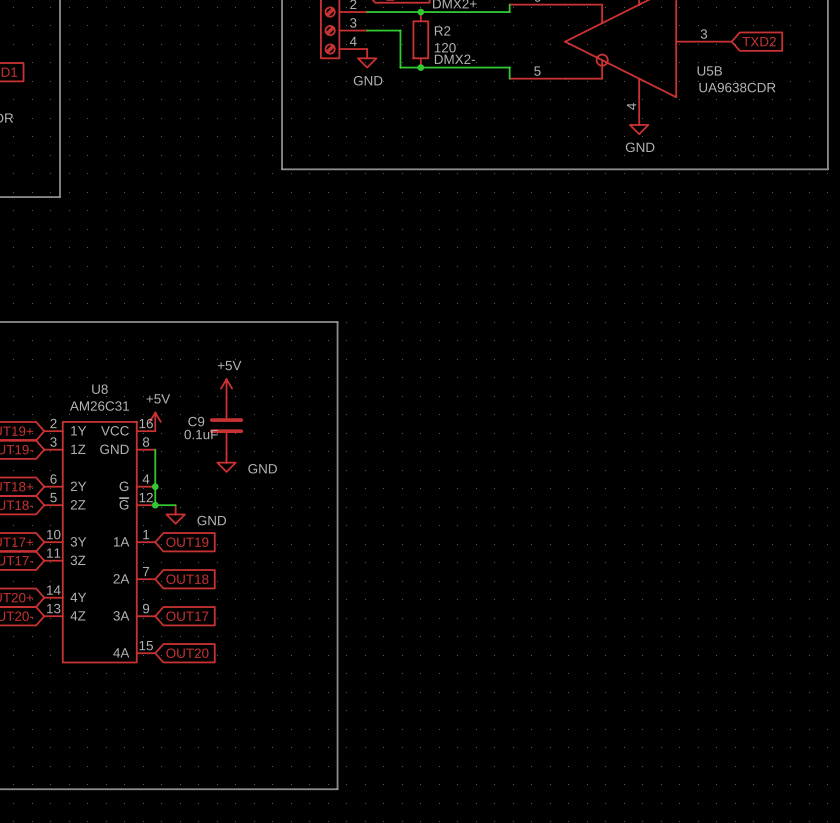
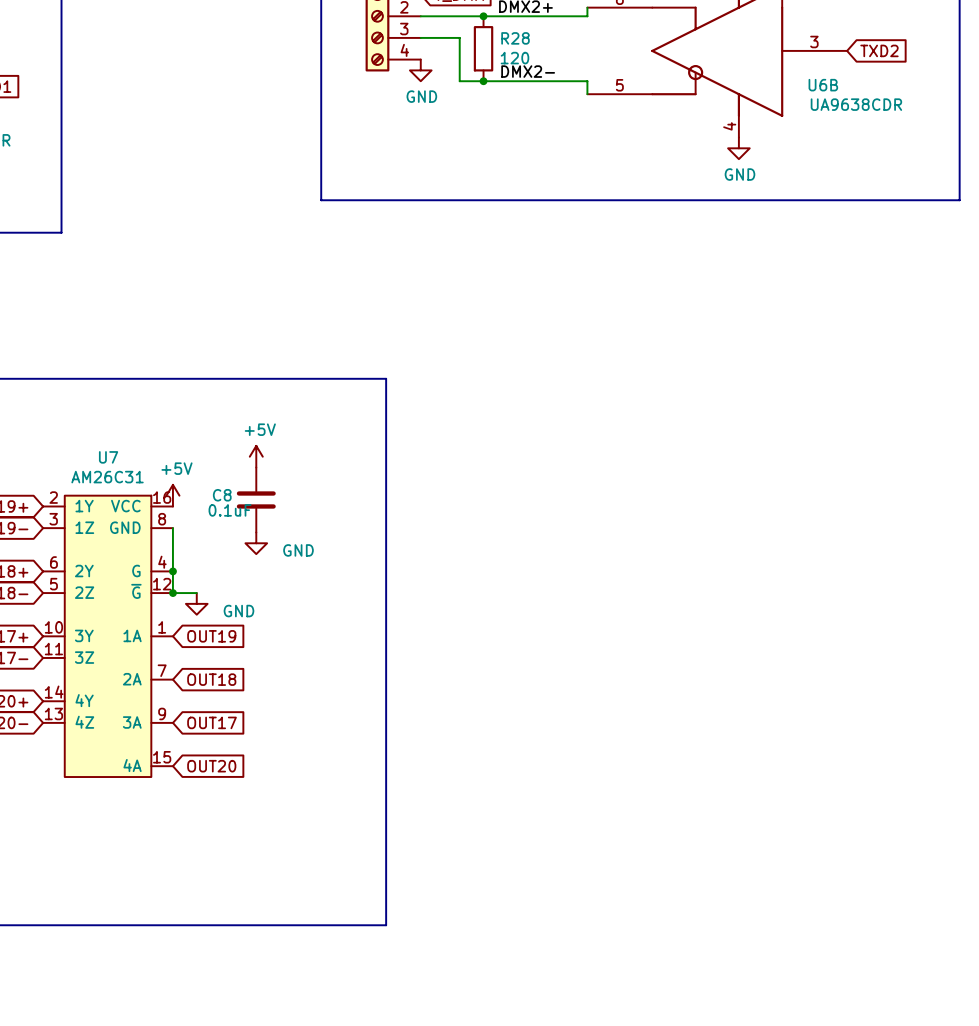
R2 name: R2 (442, 30) -> R28 (515, 38)
U5B name: U5B (709, 70) -> U6B (823, 85)
U8 name: U8 (99, 389) -> U7 (108, 457)
C9 name: C9 (196, 421) -> C8 (222, 495)

